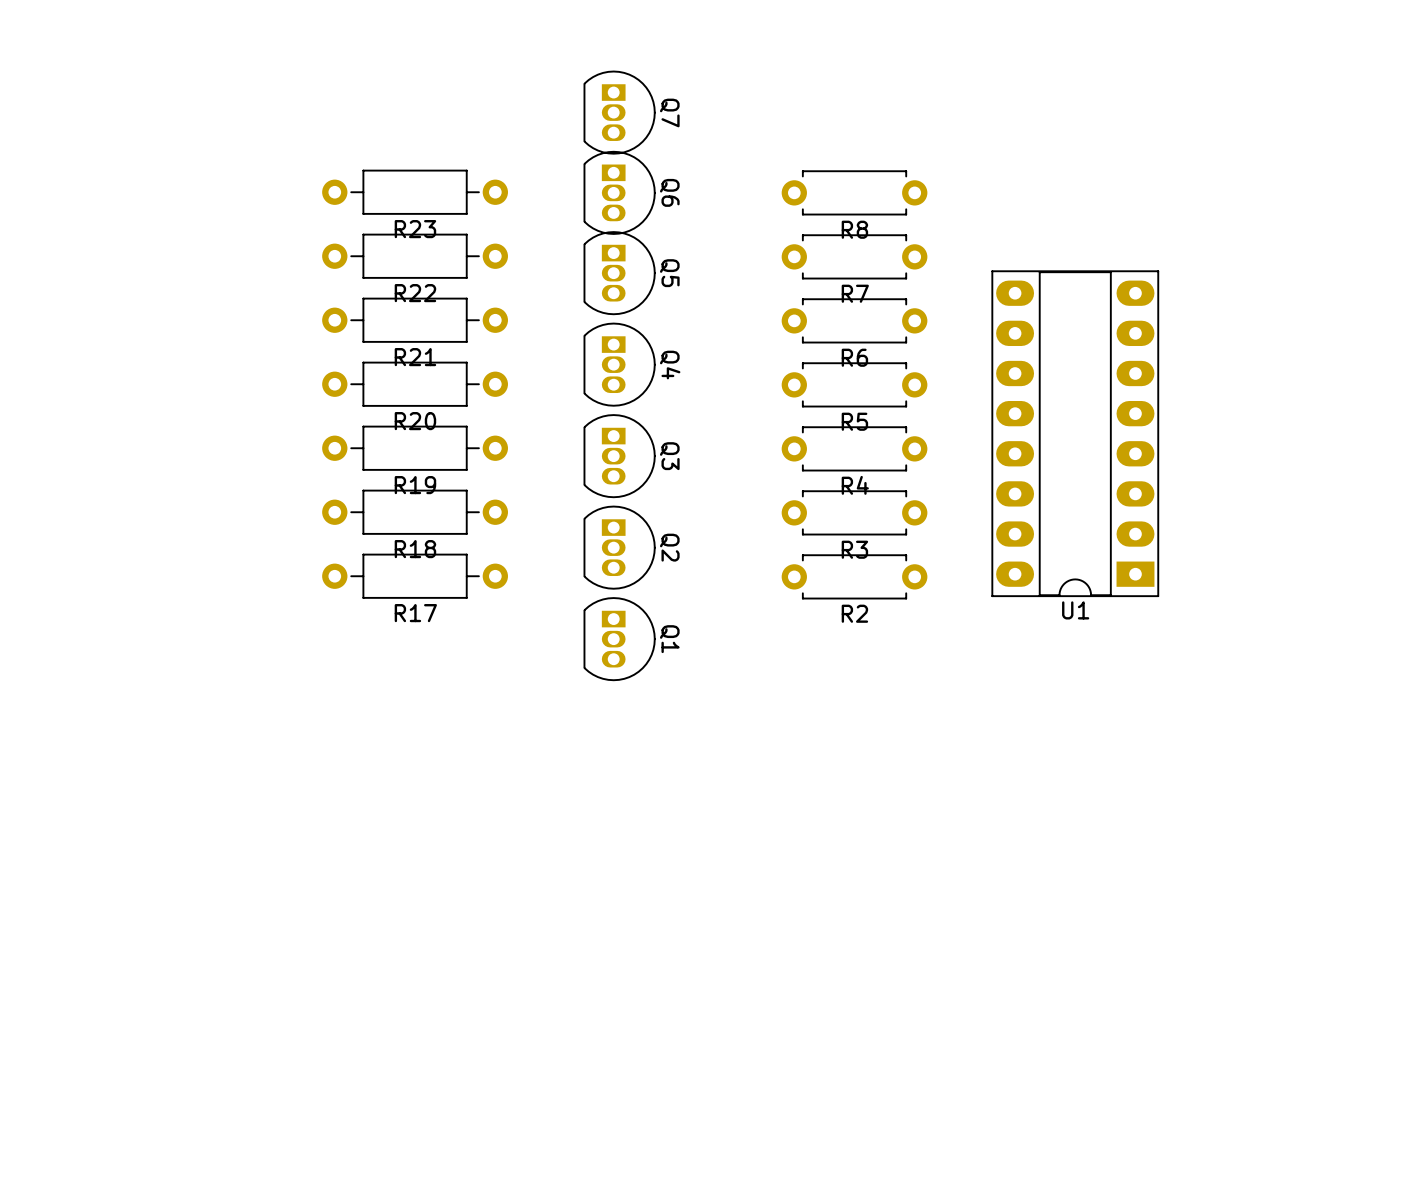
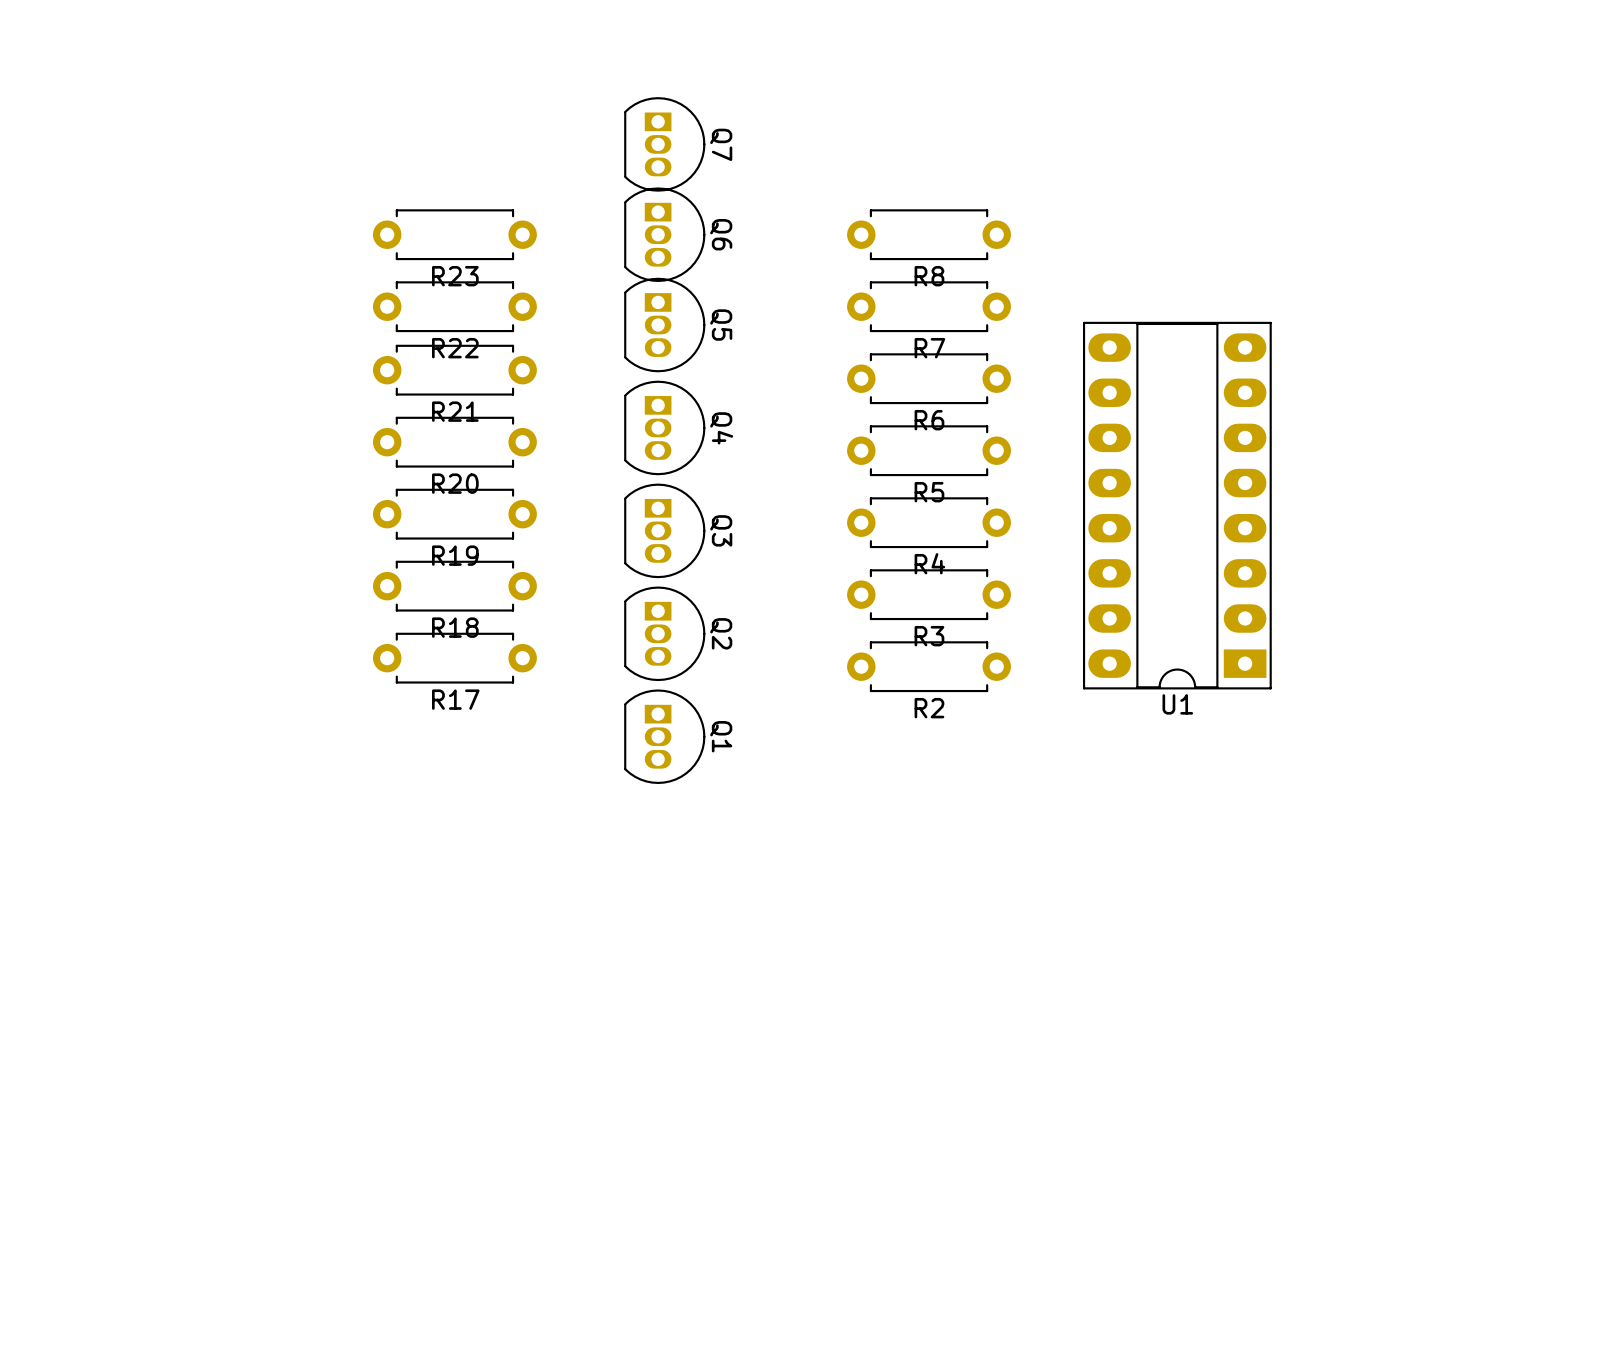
R23 footprint: [322, 169, 508, 215] -> [372, 209, 537, 261]
R22 footprint: [322, 233, 508, 279] -> [372, 281, 537, 333]
R21 footprint: [322, 297, 508, 343] -> [372, 344, 537, 396]
R20 footprint: [322, 361, 508, 407] -> [372, 416, 537, 468]
R19 footprint: [322, 425, 508, 471] -> [372, 488, 537, 540]
R18 footprint: [322, 489, 508, 535] -> [372, 560, 537, 612]
R17 footprint: [322, 553, 508, 599] -> [372, 632, 537, 684]

